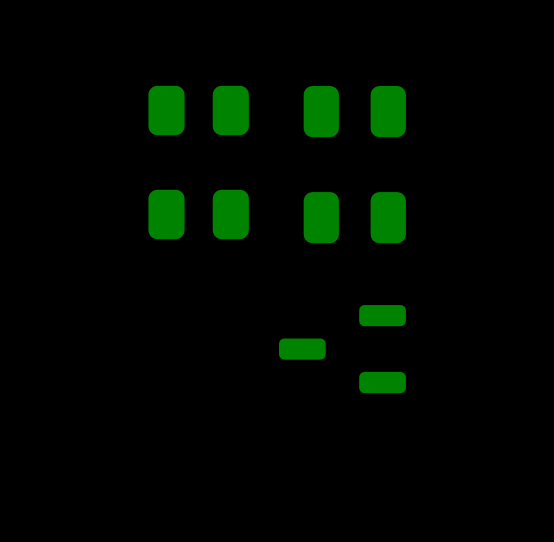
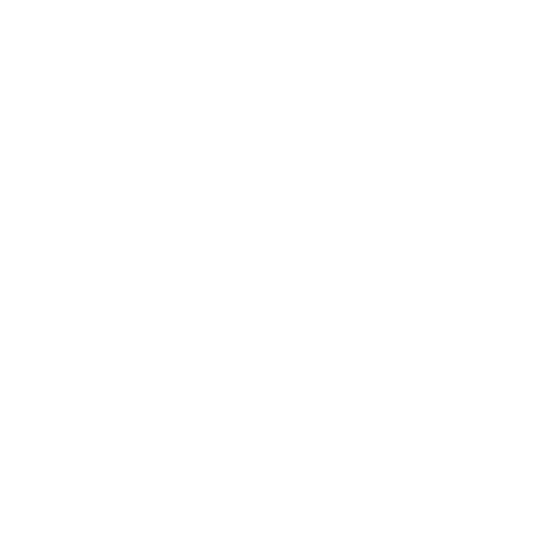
part: (198, 110) -> none
part: (354, 111) -> none
part: (198, 214) -> none
part: (354, 217) -> none
part: (342, 349) -> none

